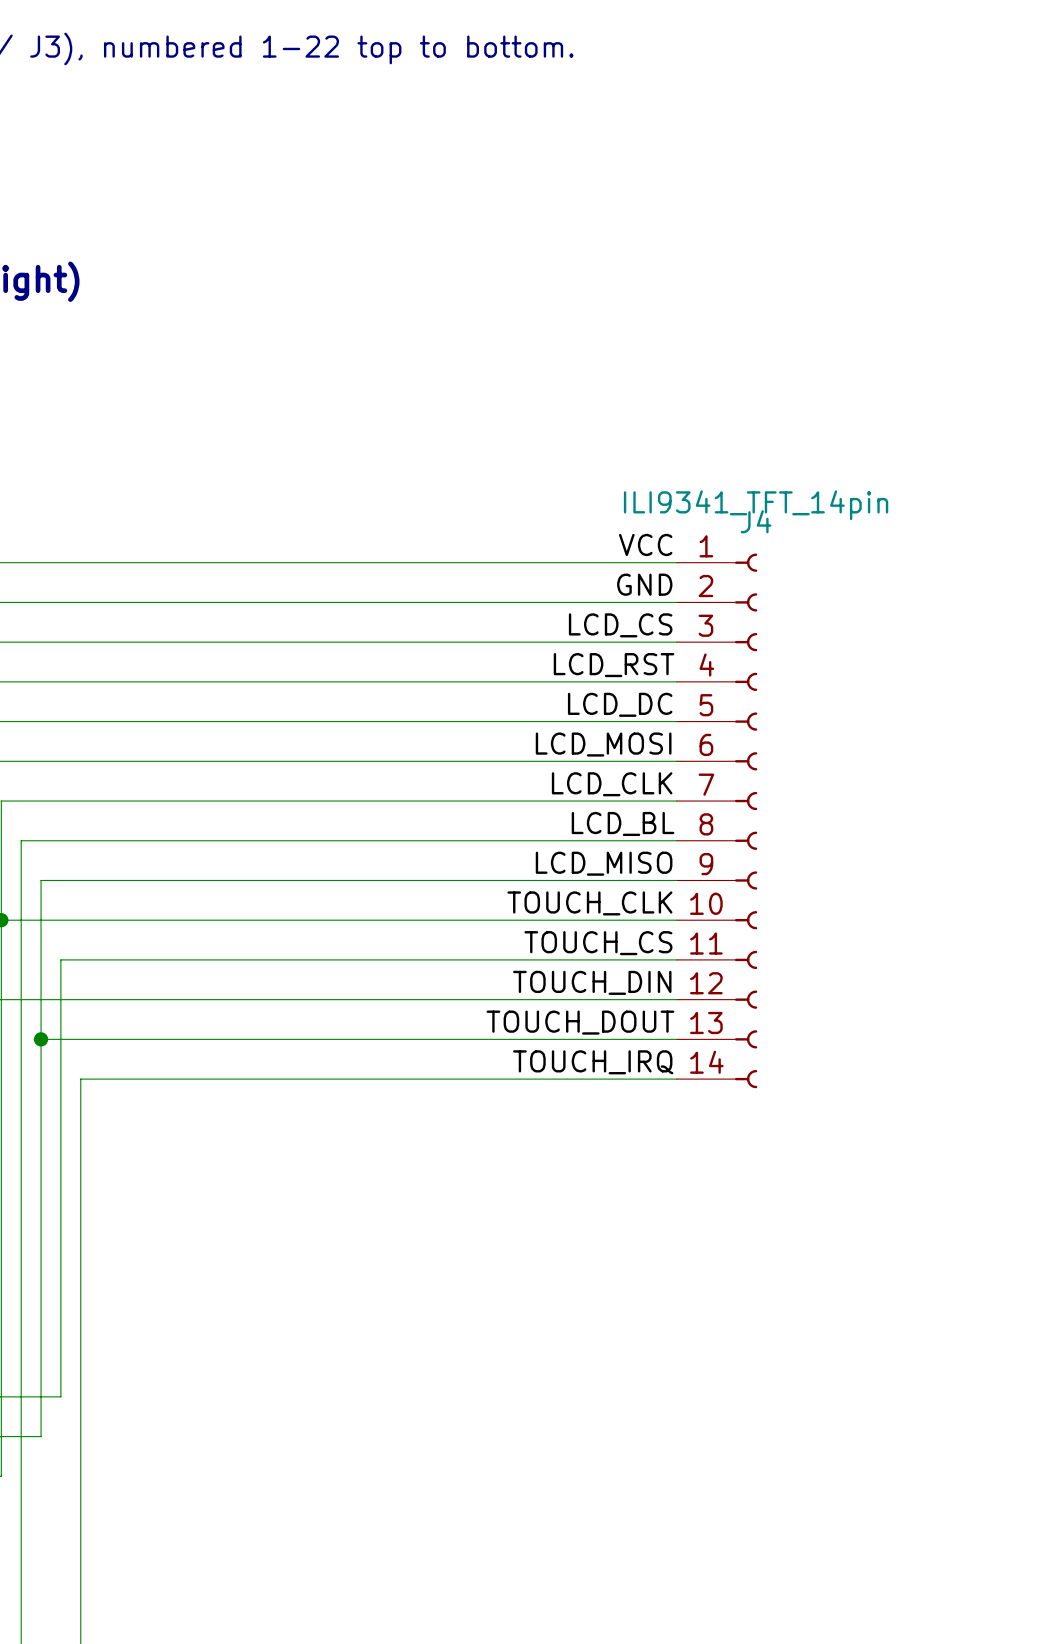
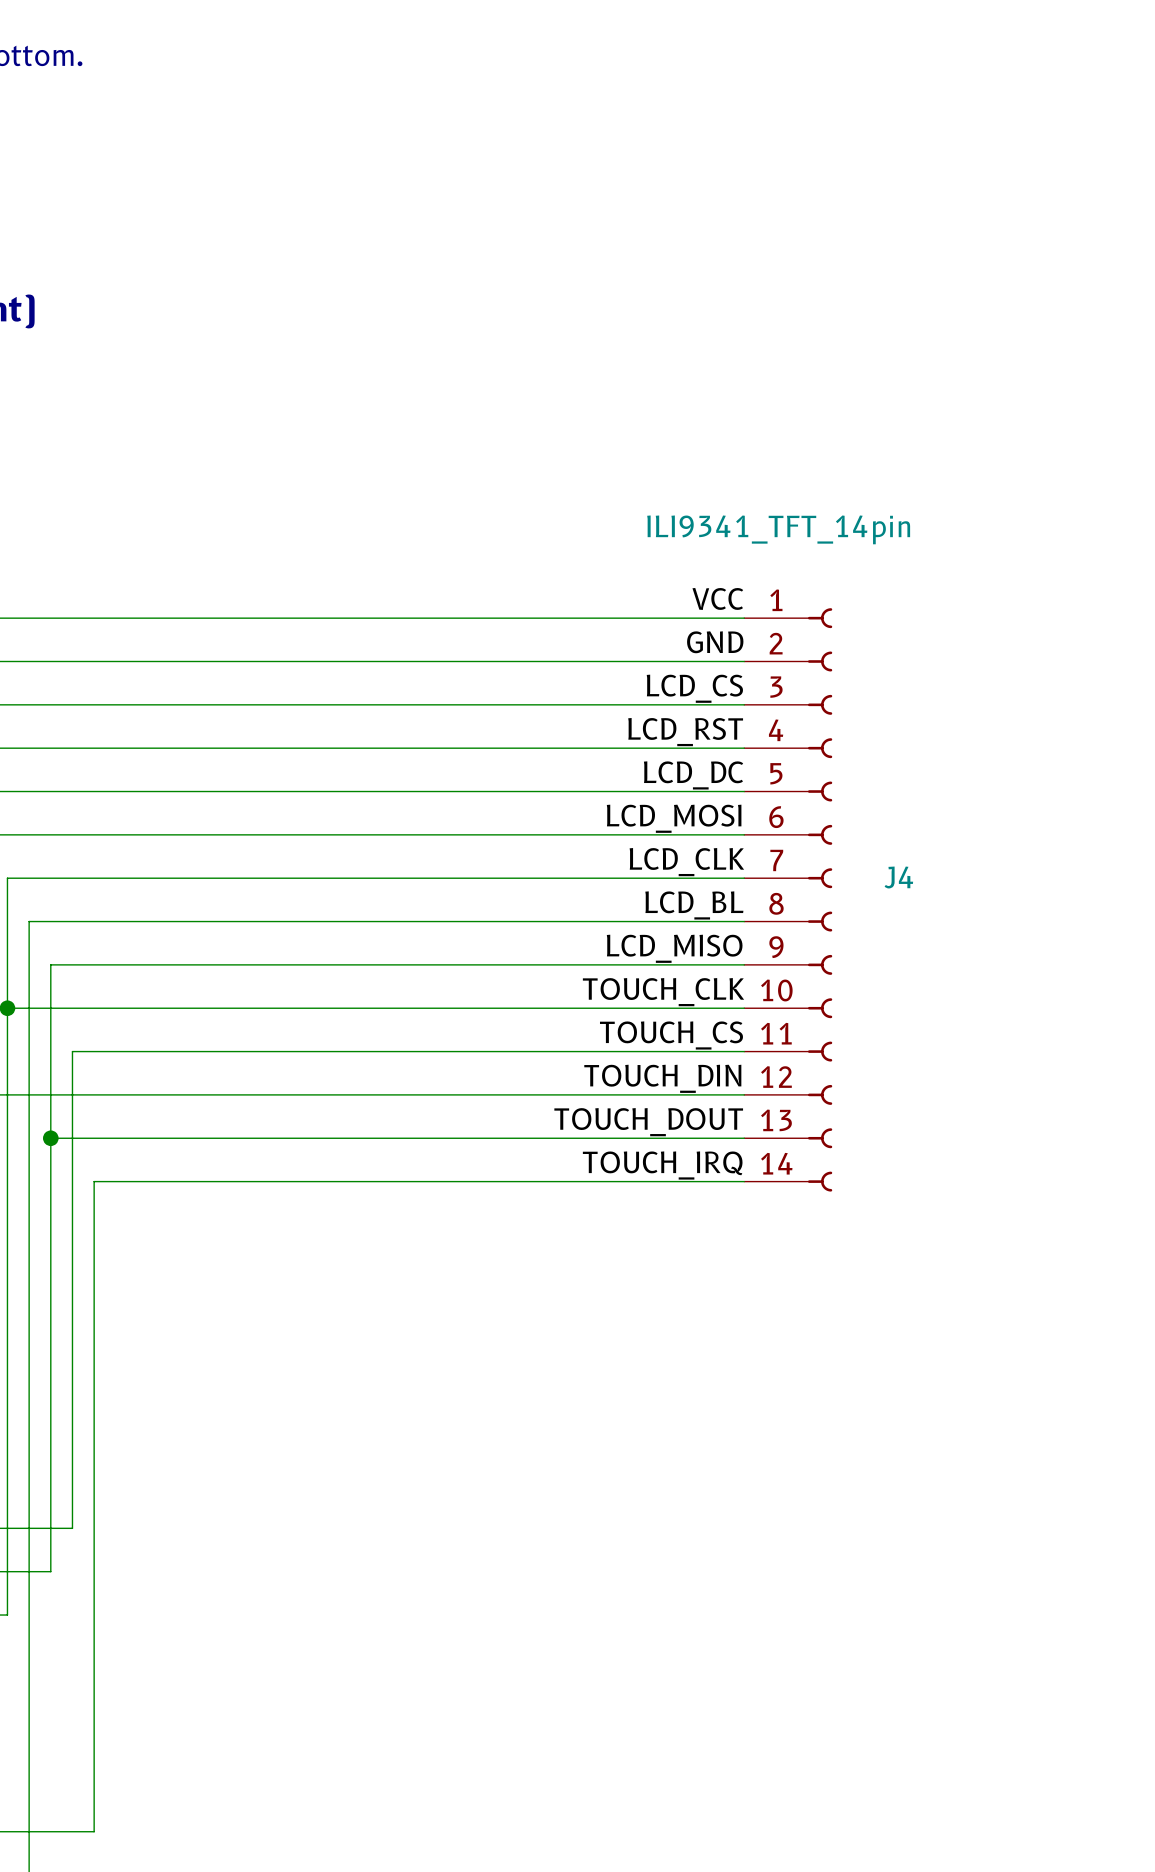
J4 value position: ILI9341_TFT_14pin (756, 505) -> ILI9341_TFT_14pin (778, 529)
J4 name position: J4 (756, 521) -> J4 (898, 877)

